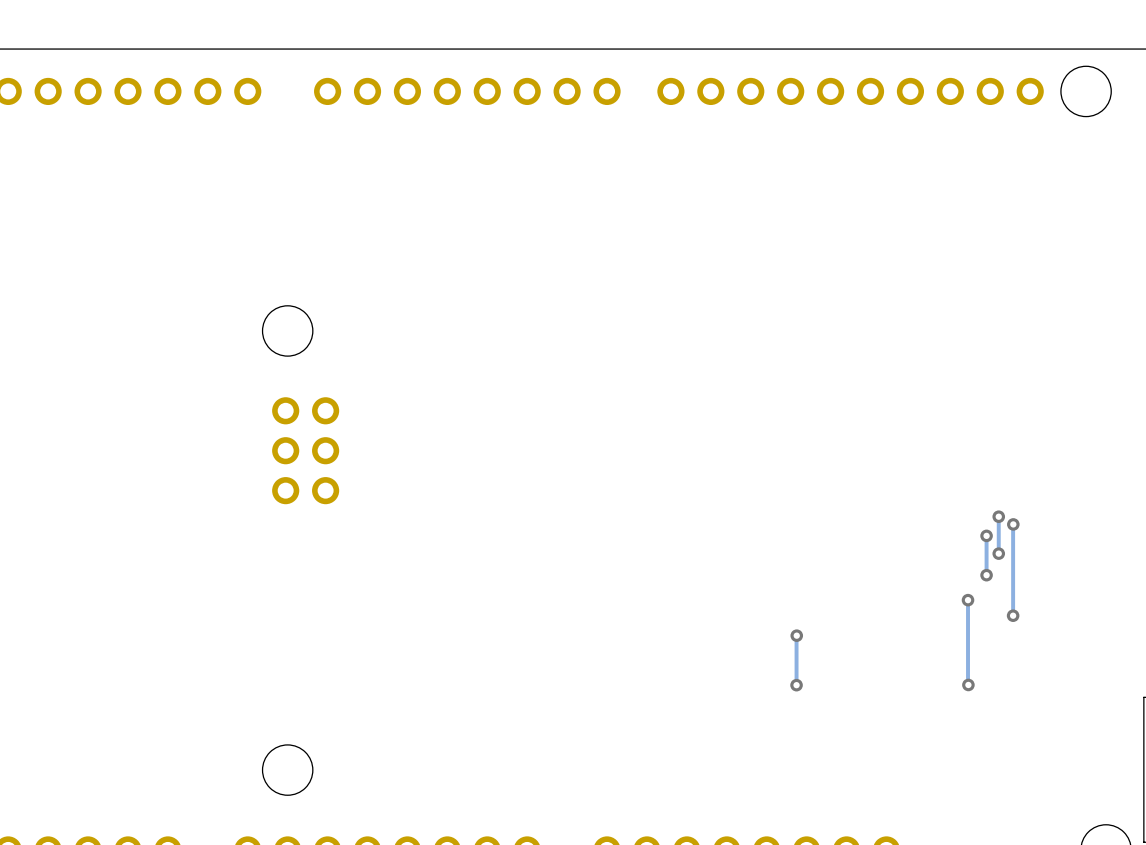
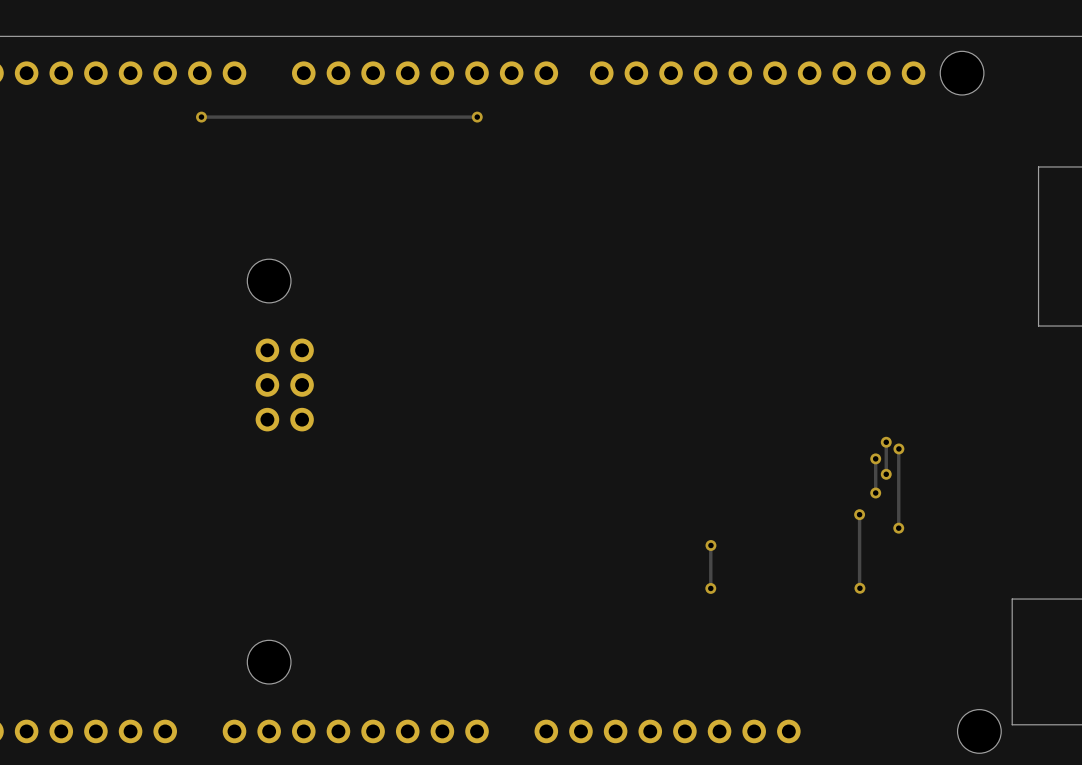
via: none -> (201, 117)
track: none -> (477, 117) (201, 117)
via: none -> (477, 117)

